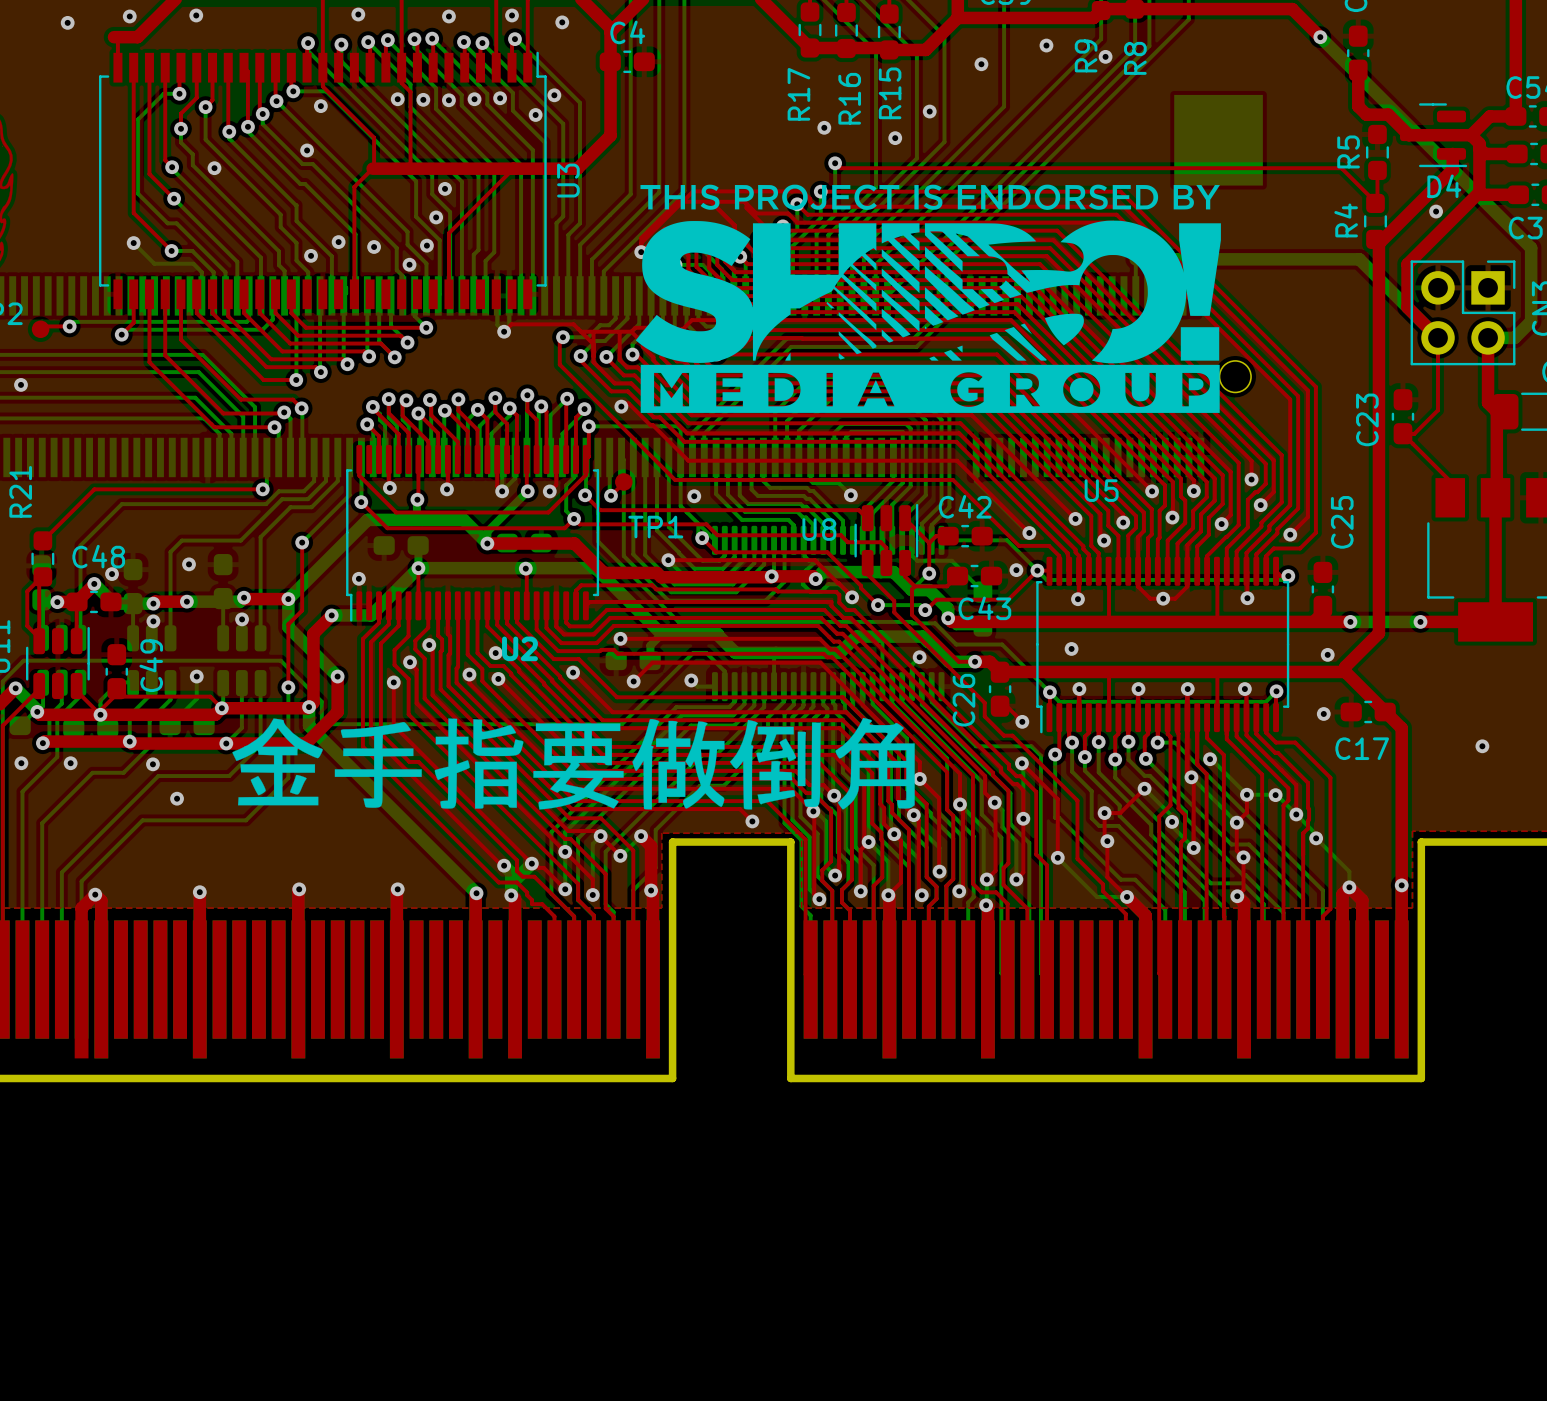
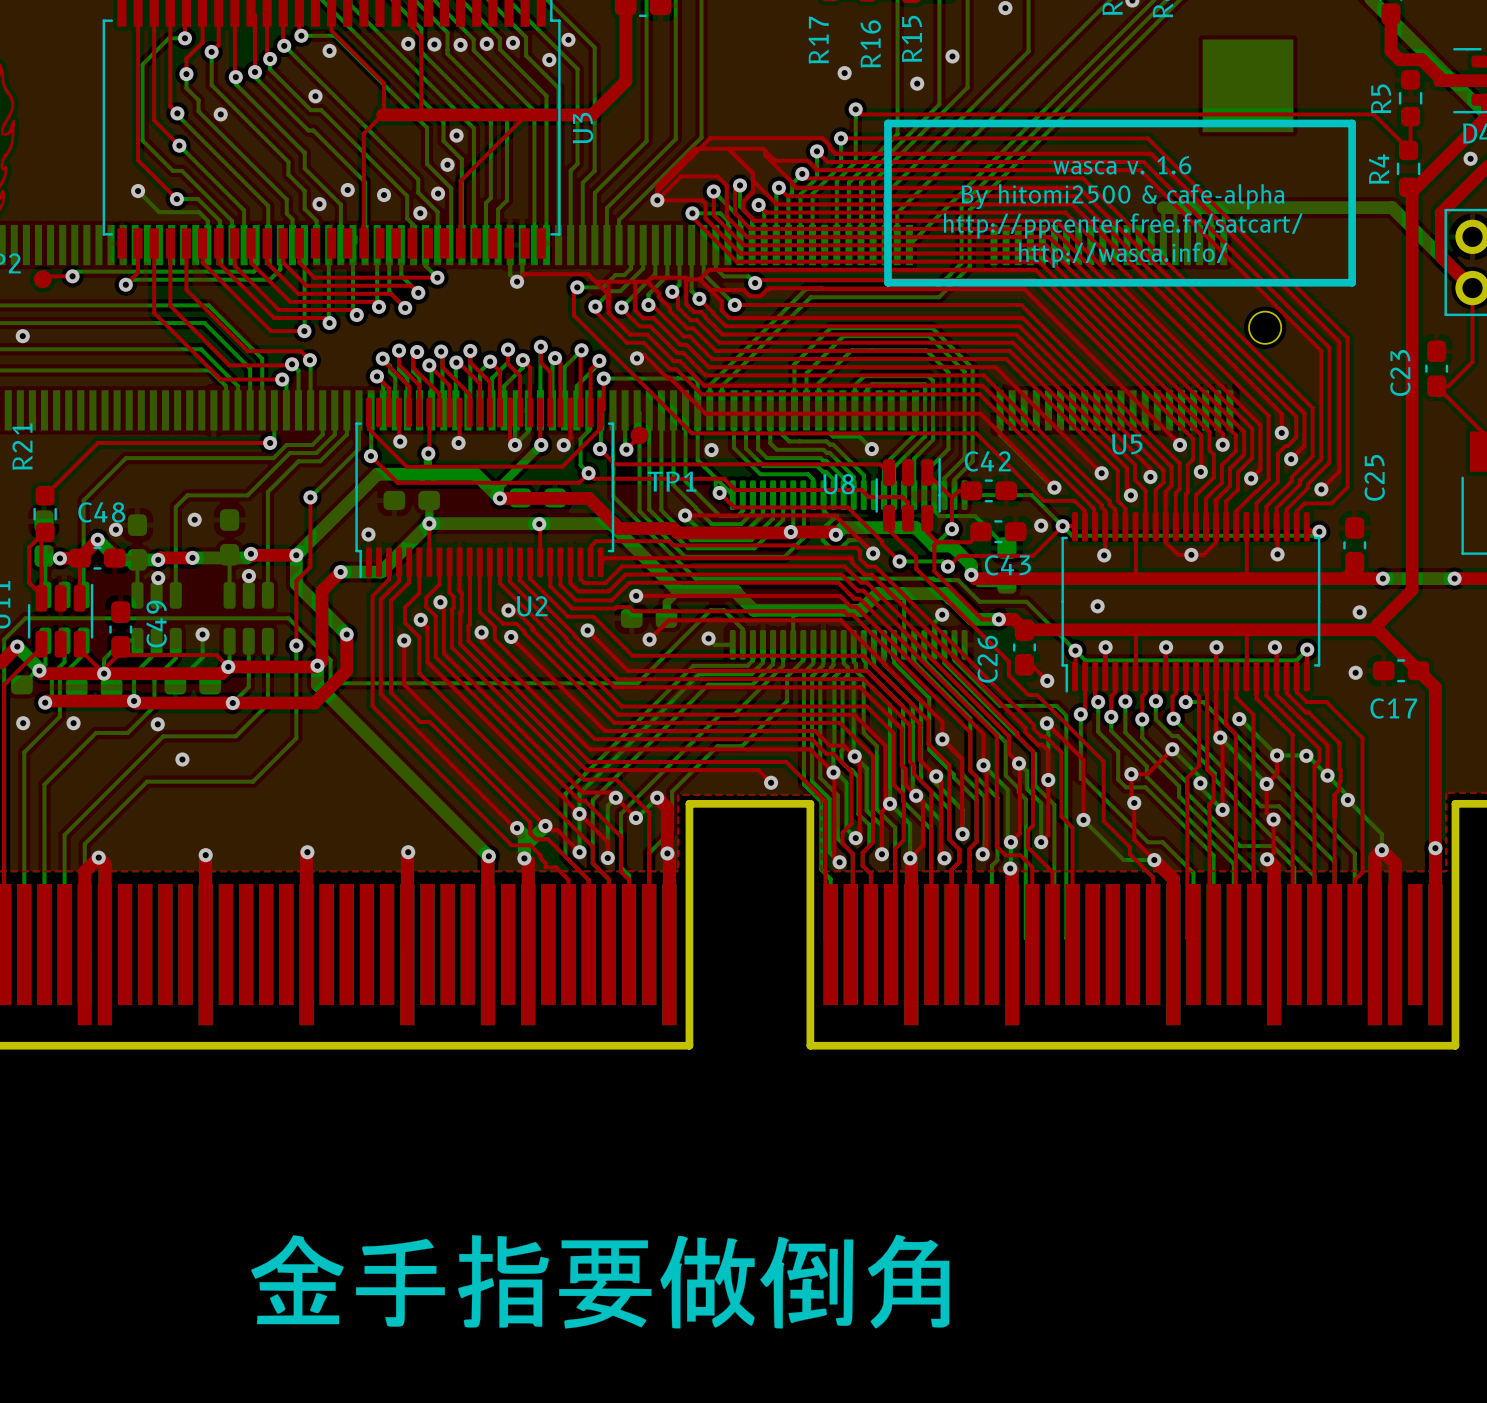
line: none -> (887, 123) (1352, 123) (1352, 282) (887, 282) (887, 123)
drawing: [635, 184, 1221, 413] -> none
text: none -> wasca v. 1.6 (1122, 165)
text: none -> By hitomi2500 & cafe-alpha (1123, 196)
text: none -> http://ppcenter.free.fr/satcart/ (1123, 225)
text: none -> http://wasca.info/ (1123, 255)
drawing: [232, 717, 915, 810] -> none
drawing: none -> [251, 1234, 950, 1329]

